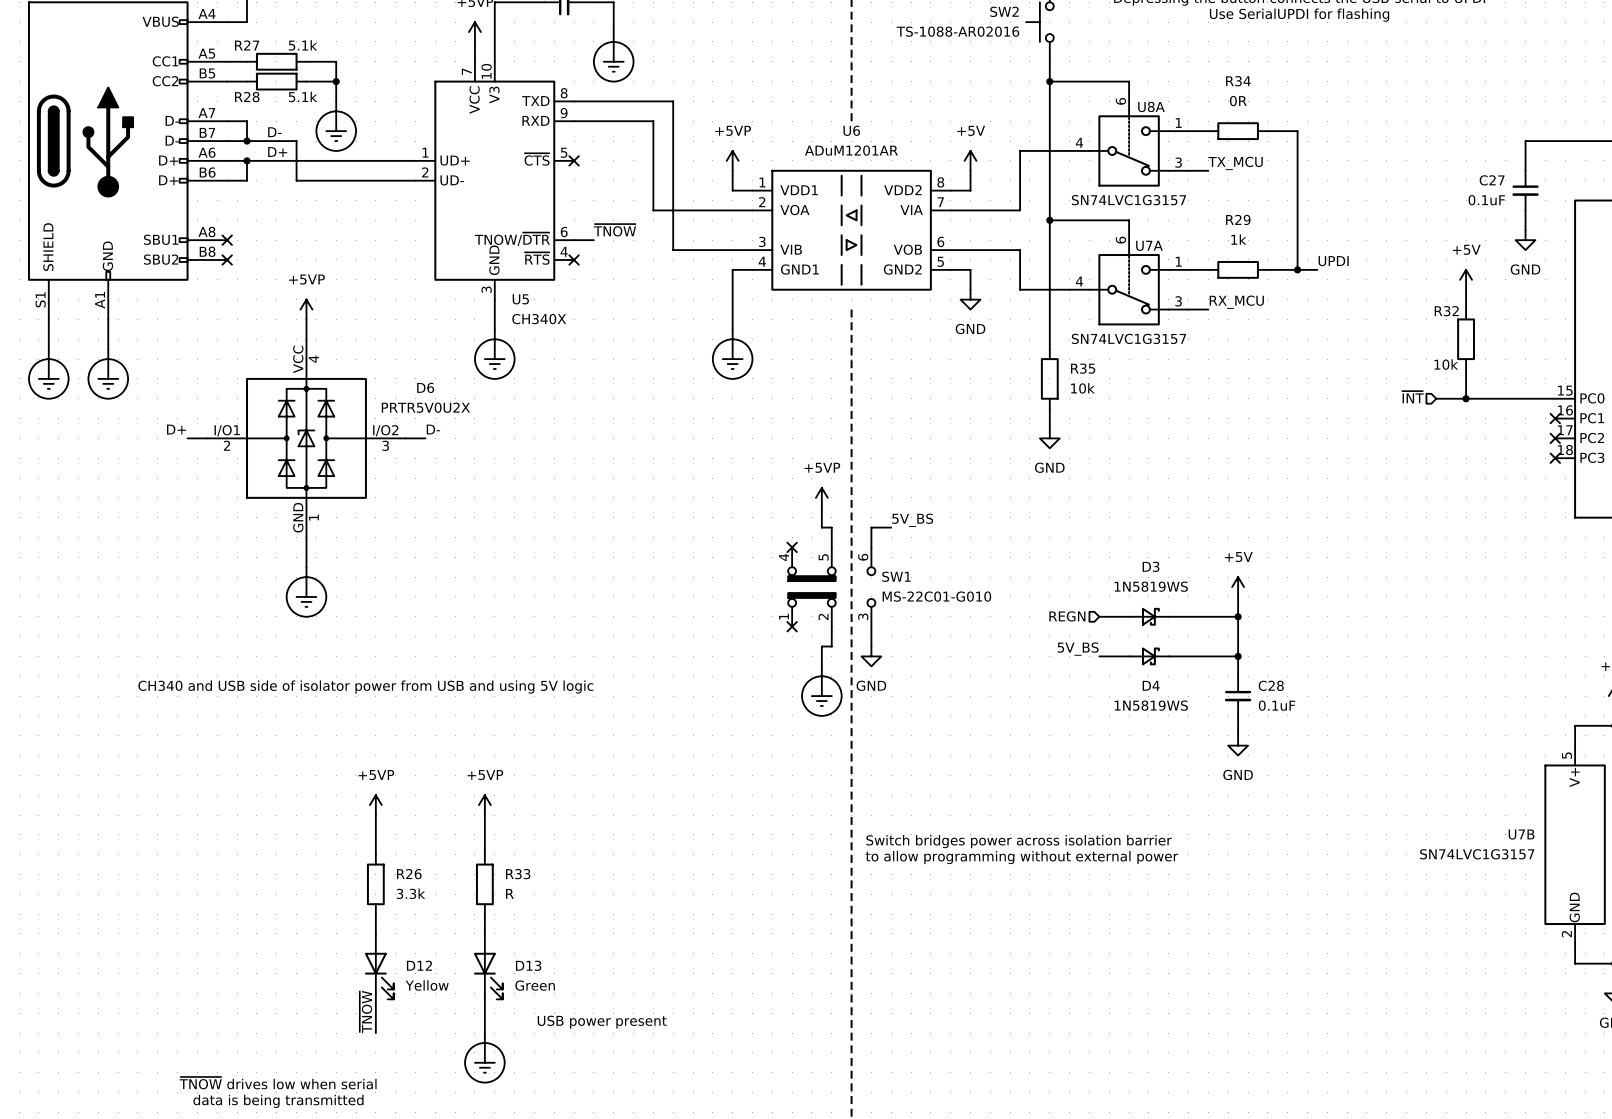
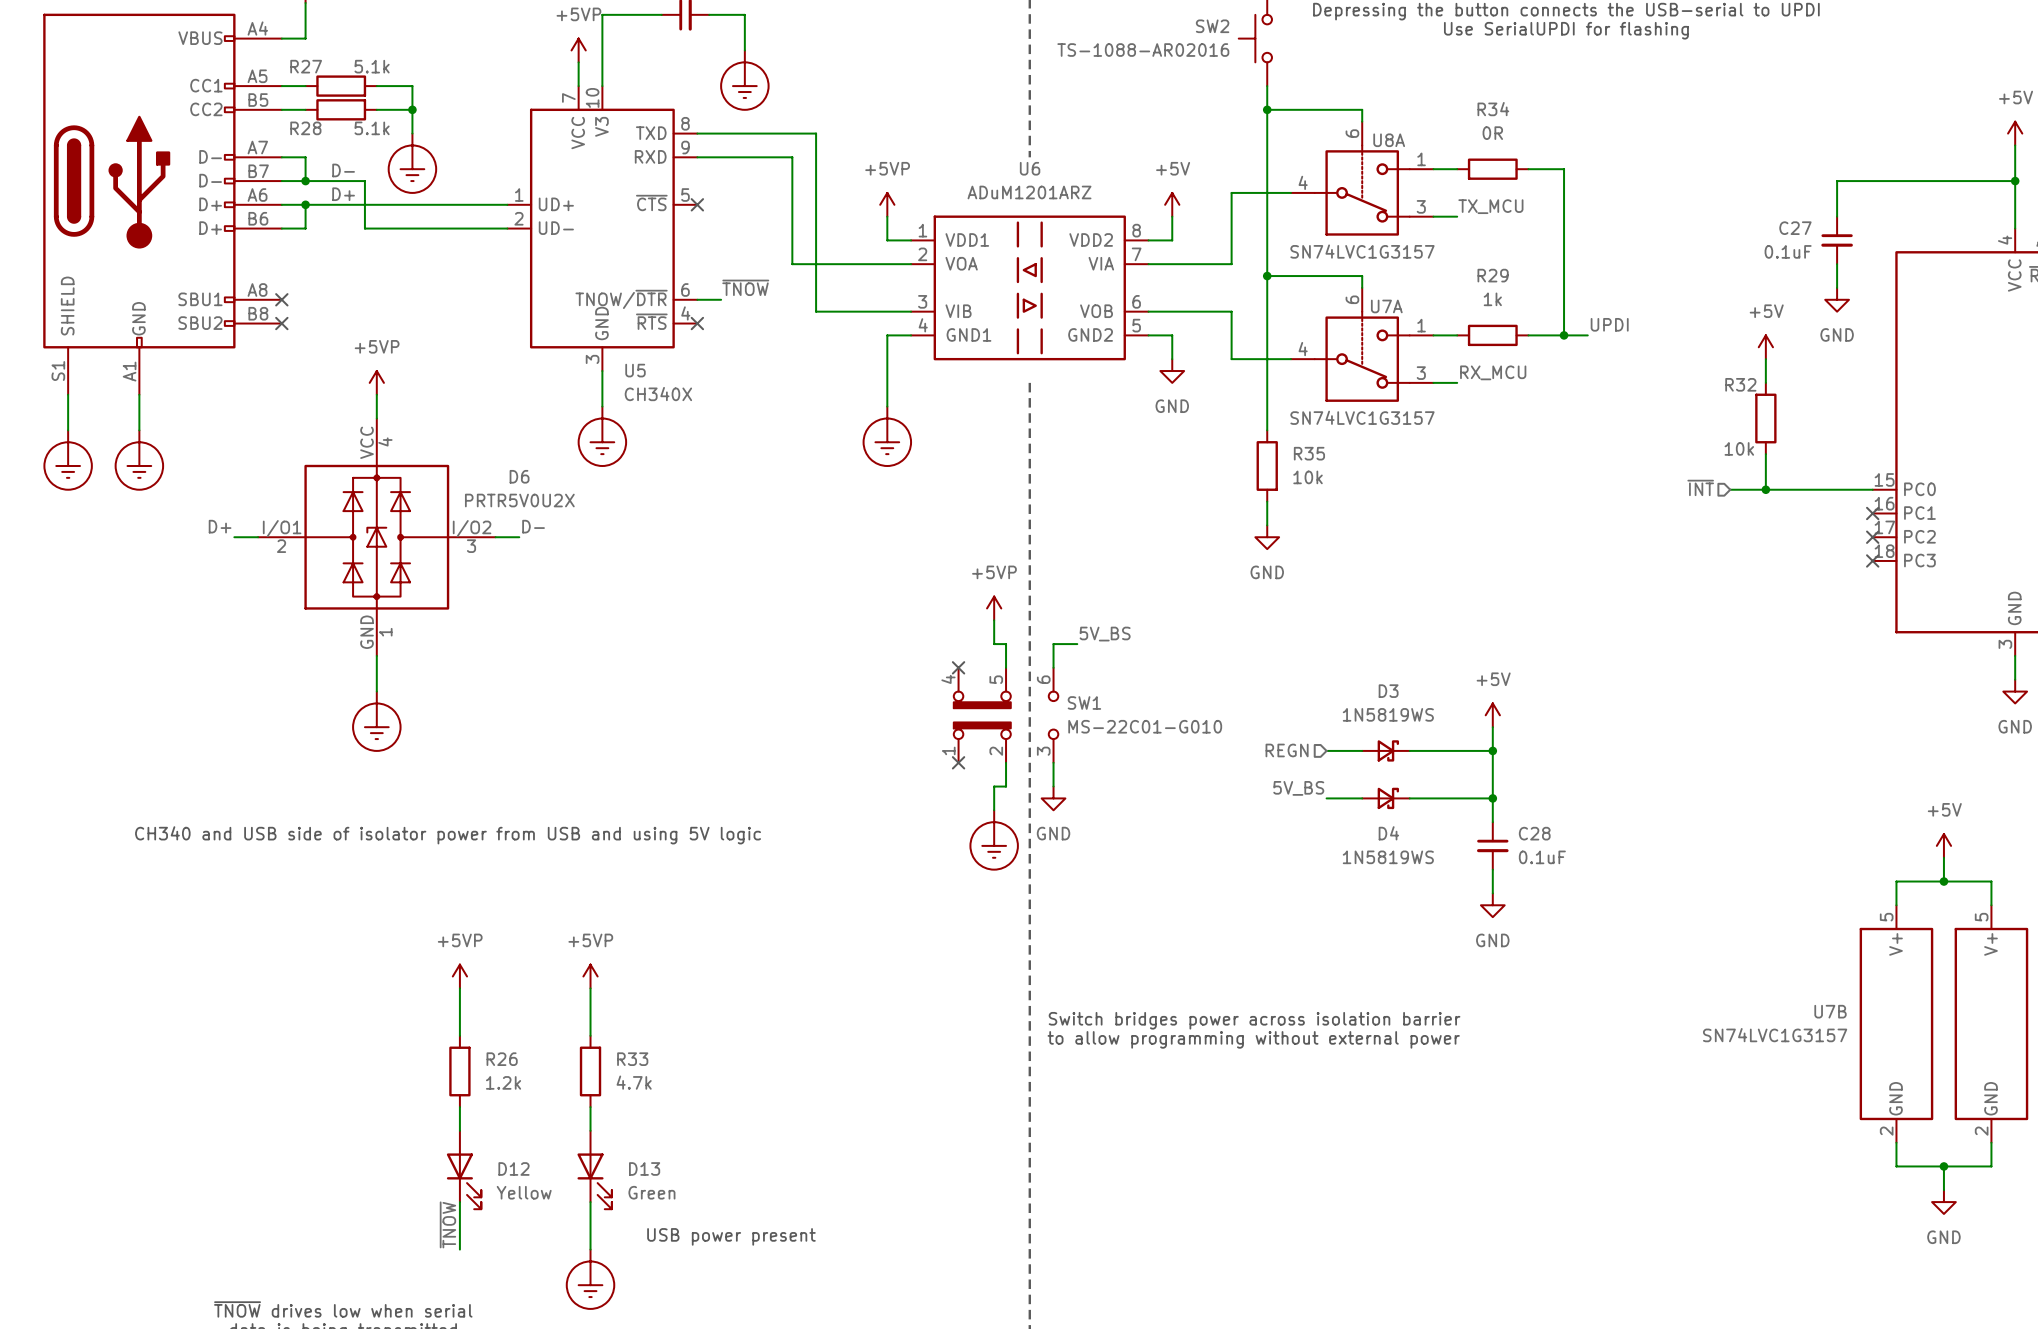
U6 value: ADuM1201AR (851, 150) -> ADuM1201ARZ (1029, 192)
R26 value: 3.3k (410, 893) -> 1.2k (503, 1082)
R33 value: R (509, 893) -> 4.7k (634, 1082)

